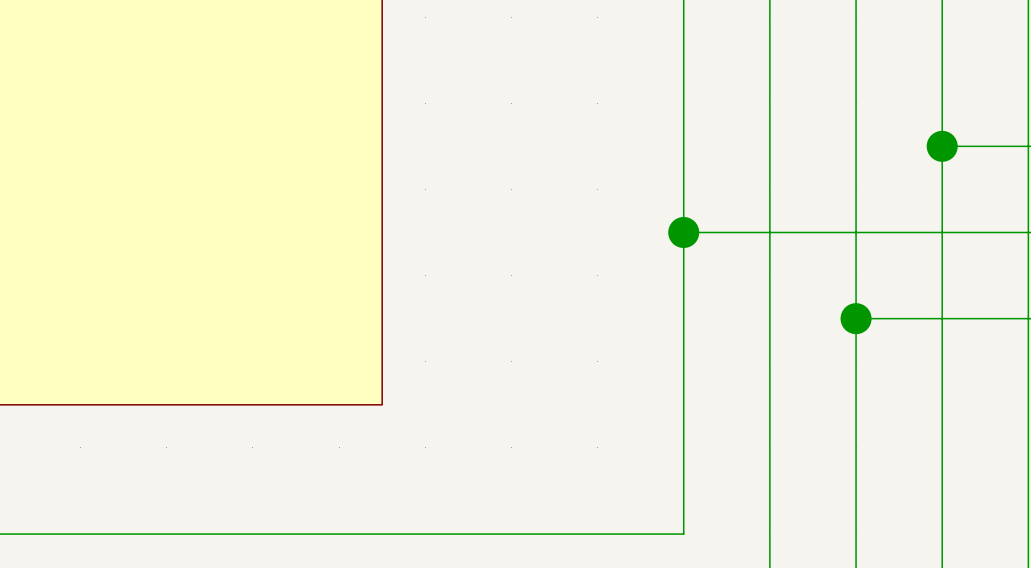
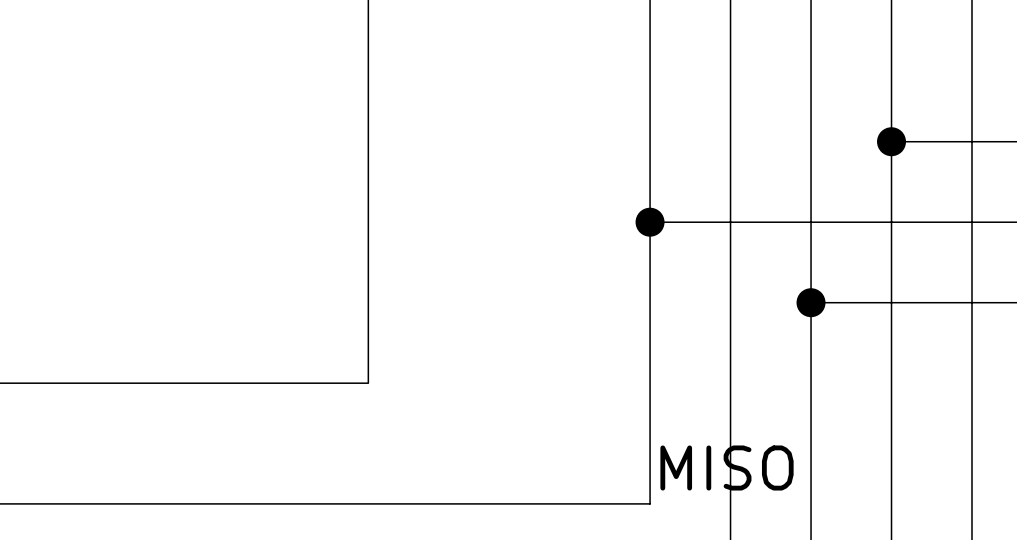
label: none -> MISO (727, 468)

